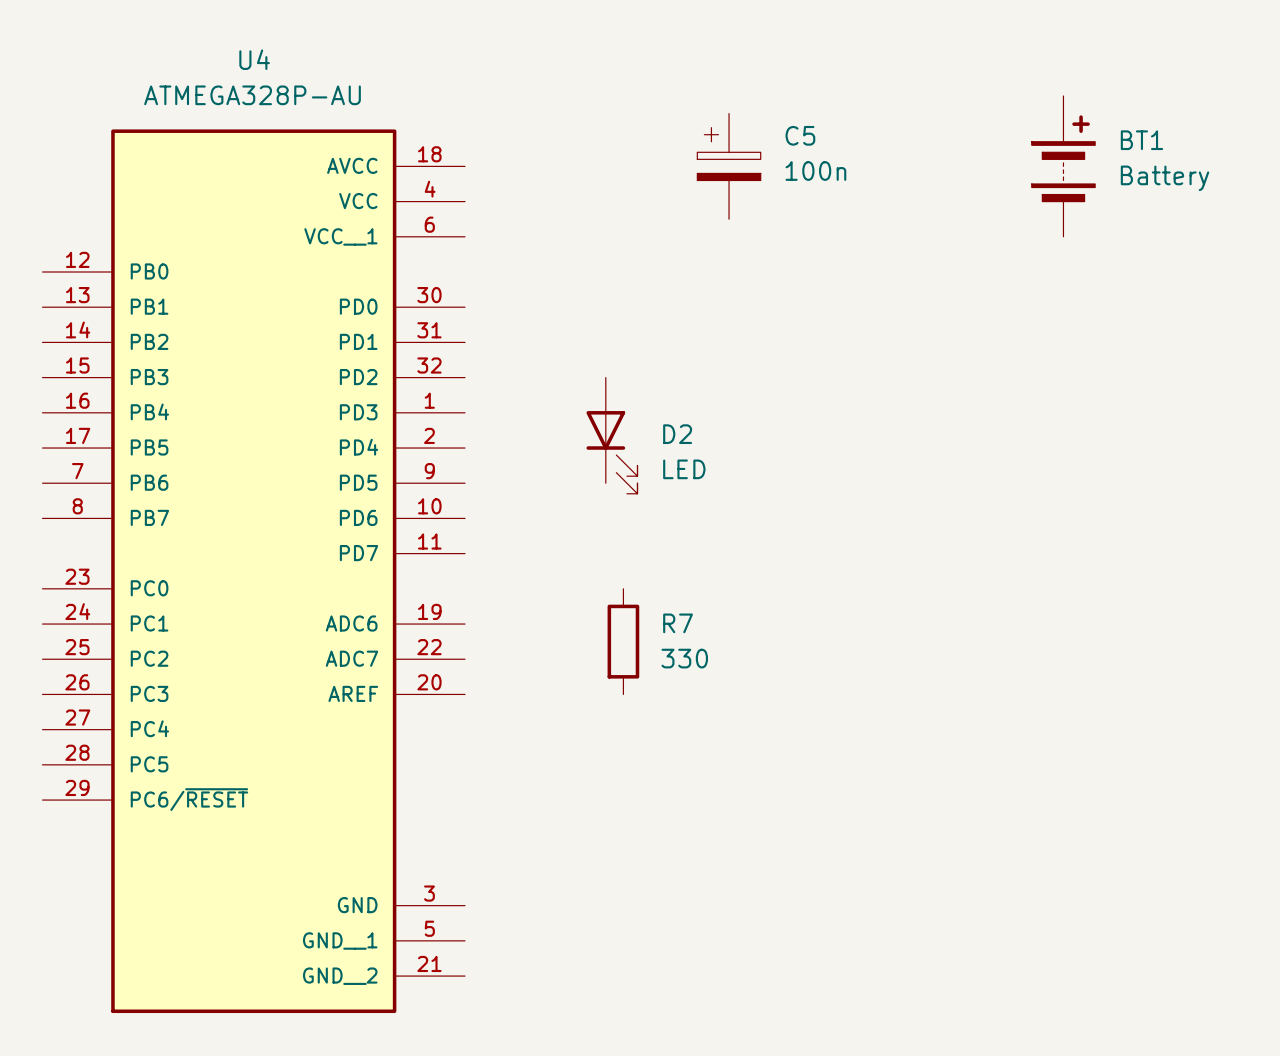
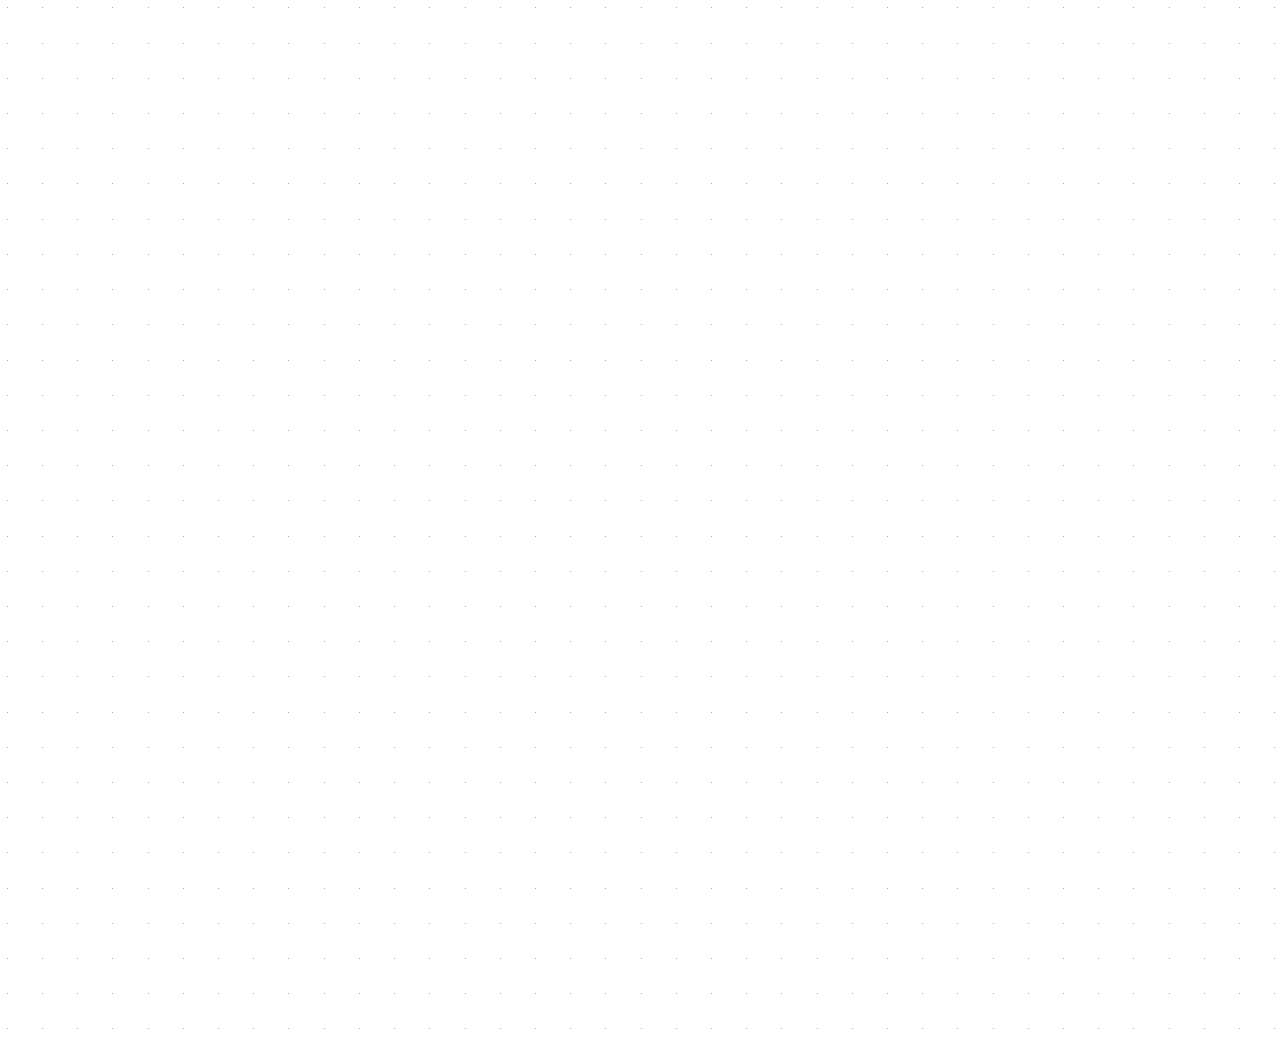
C5: 100n (729, 166) -> none
BT1: Battery (1063, 166) -> none
D2: LED (611, 435) -> none
U4: ATMEGA328P-AU (253, 571) -> none
R7: 330 (623, 641) -> none

